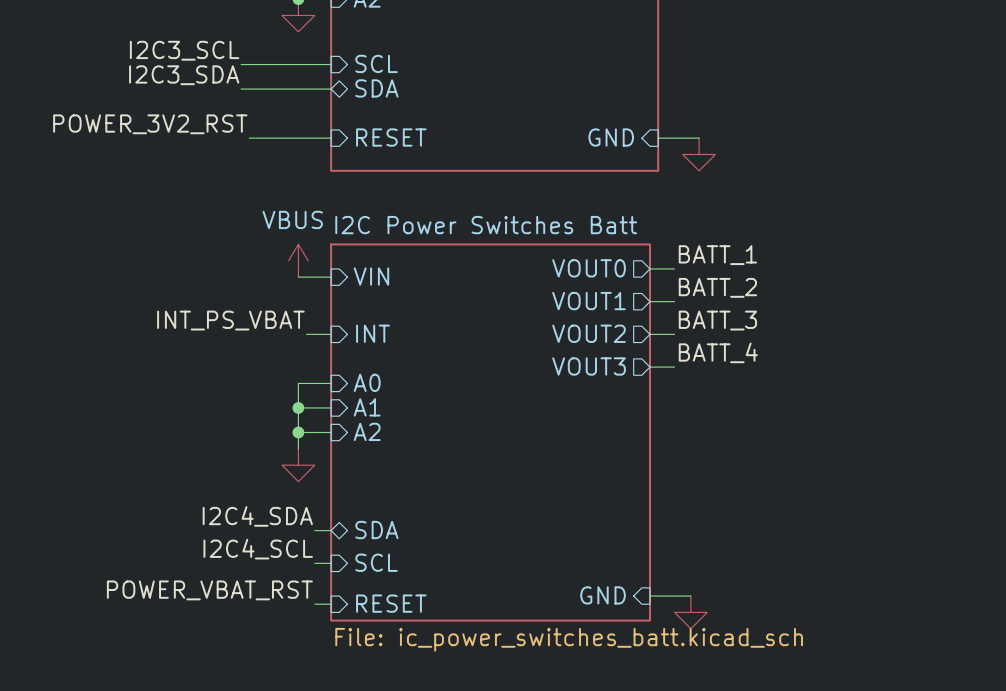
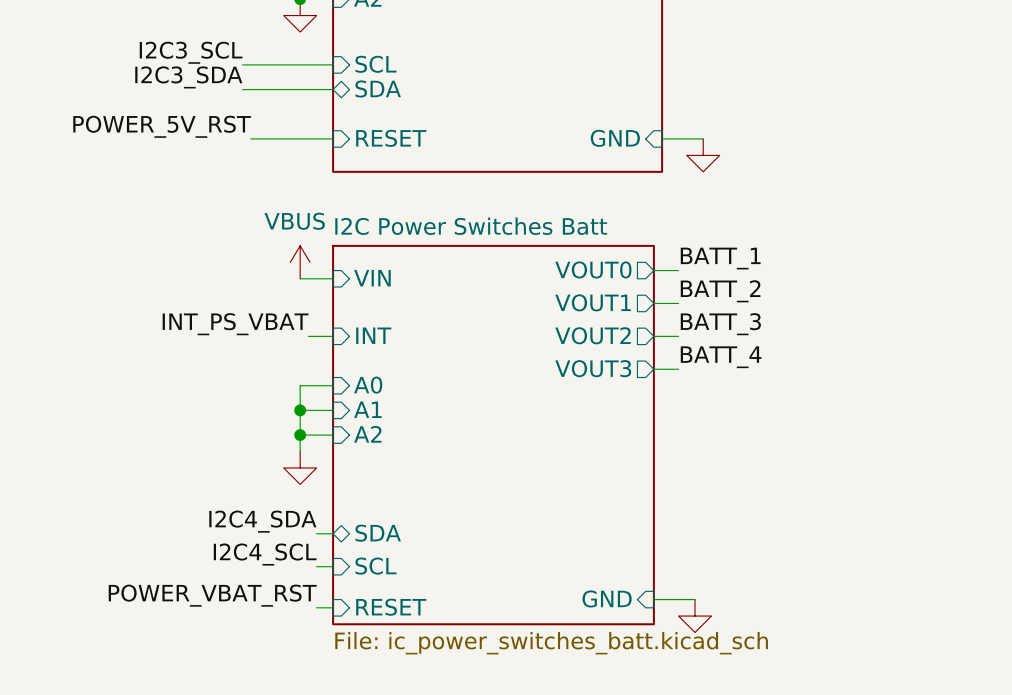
label: POWER_3V2_RST (150, 124) -> POWER_5V_RST (162, 126)

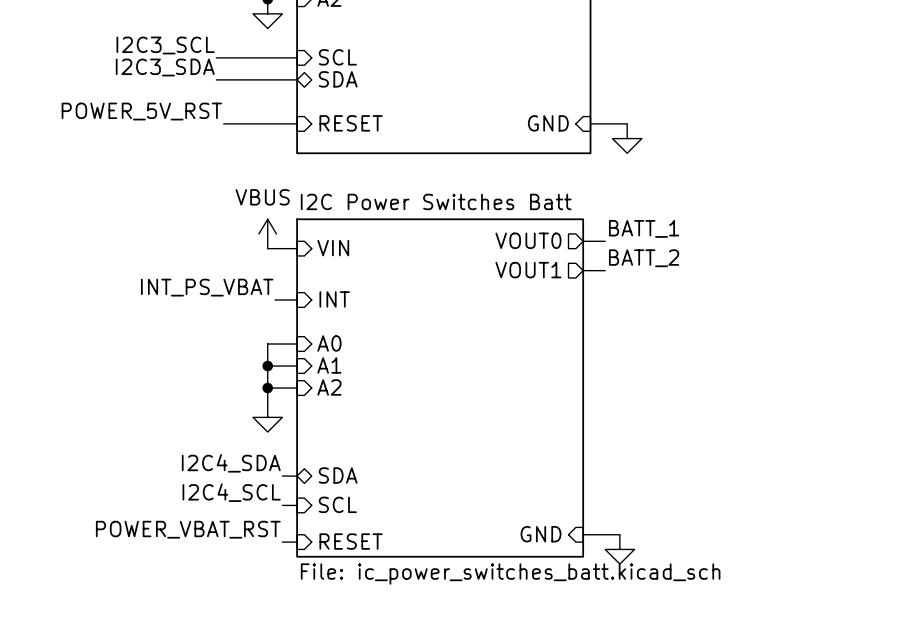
label: BATT_3 (720, 324) -> none
sheet pin: VOUT2 (593, 335) -> none
wire: (653, 336) (678, 336) -> none
label: BATT_4 (721, 357) -> none
sheet pin: VOUT3 (593, 368) -> none
wire: (653, 369) (678, 369) -> none

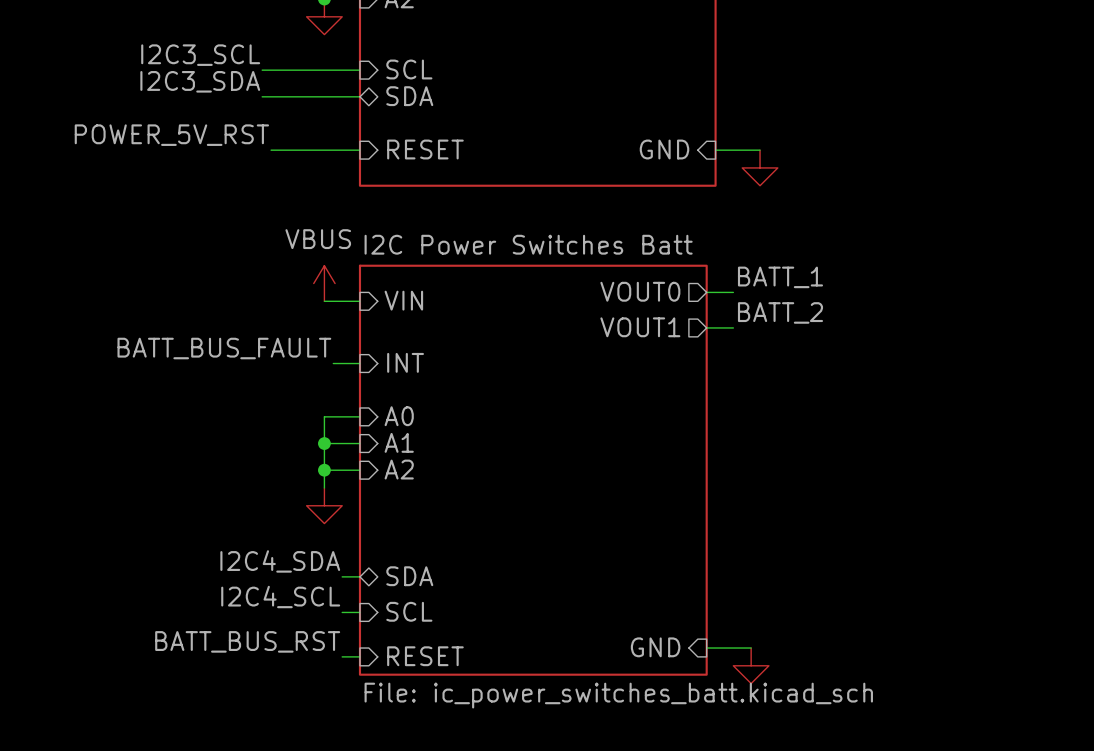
label: INT_PS_VBAT (207, 287) -> BATT_BUS_FAULT (224, 348)
label: POWER_VBAT_RST (188, 529) -> BATT_BUS_RST (247, 641)

